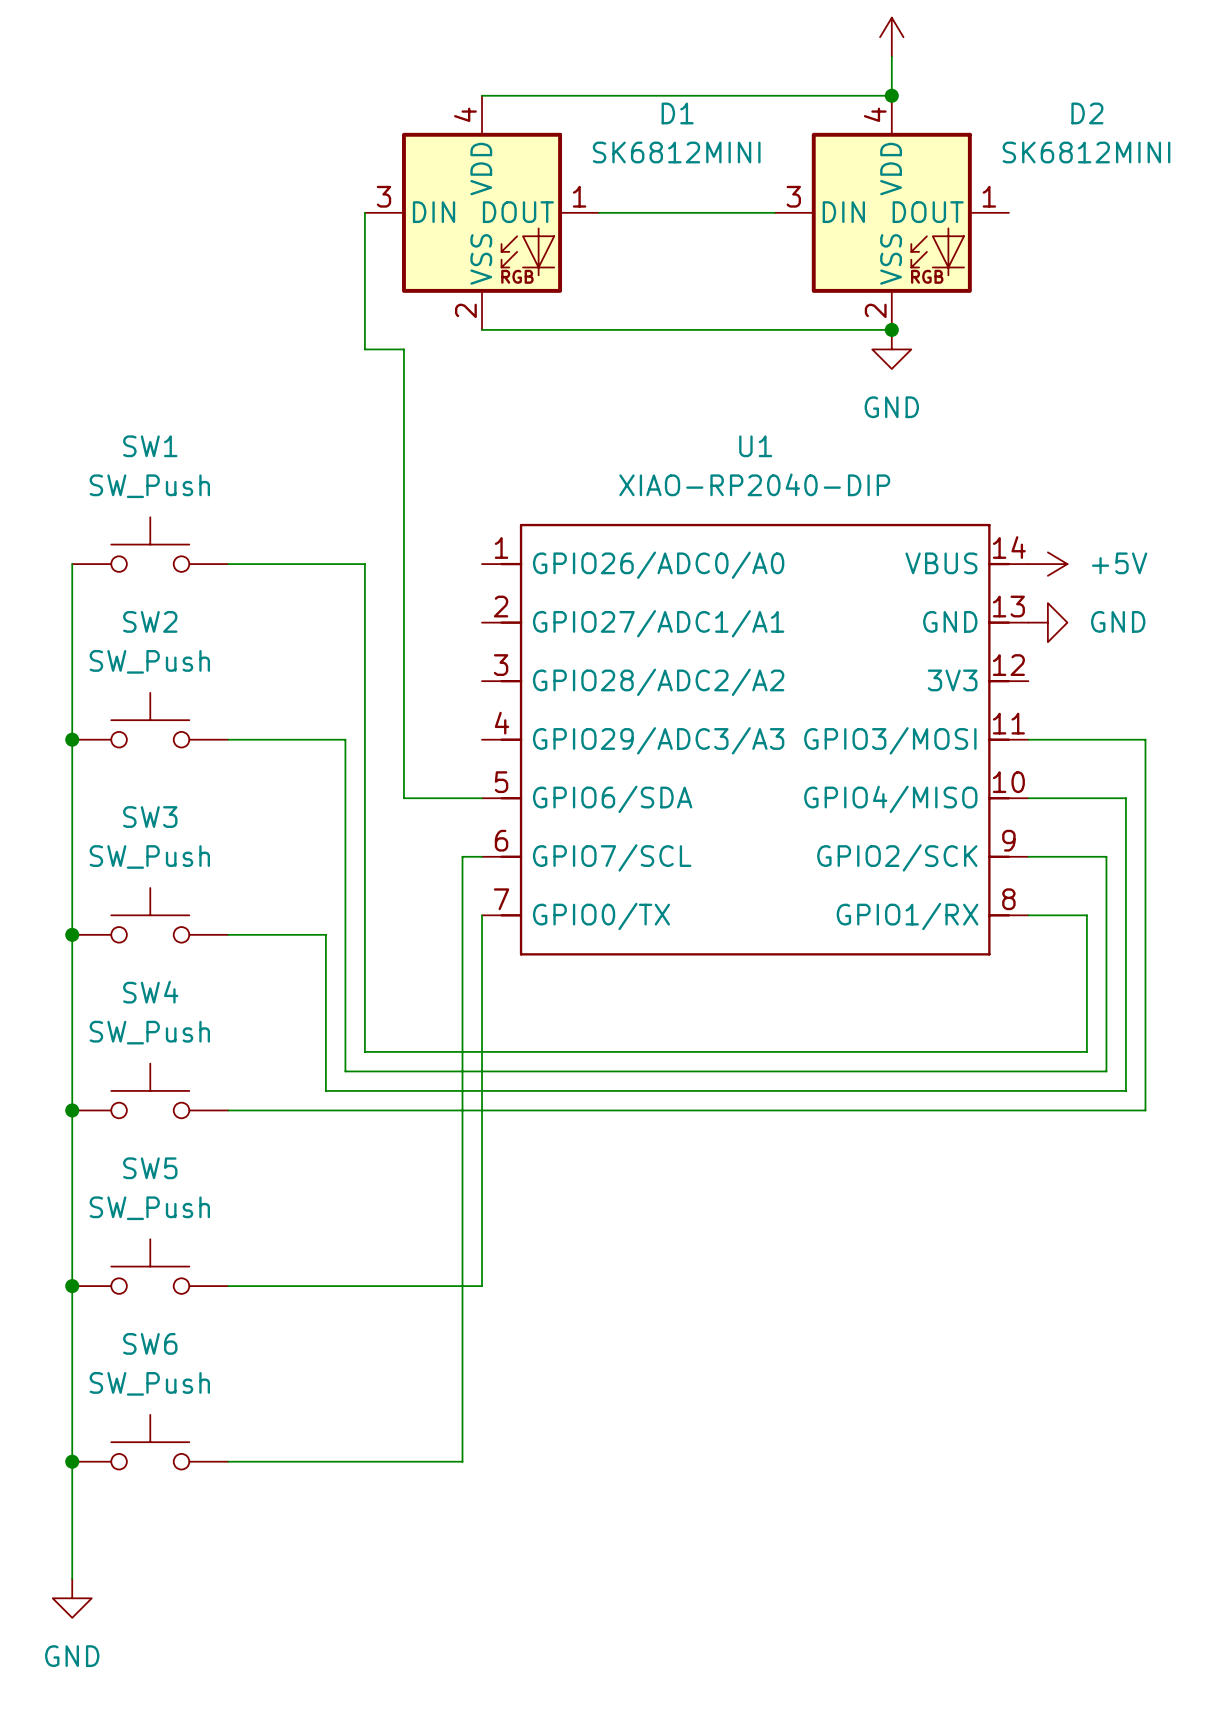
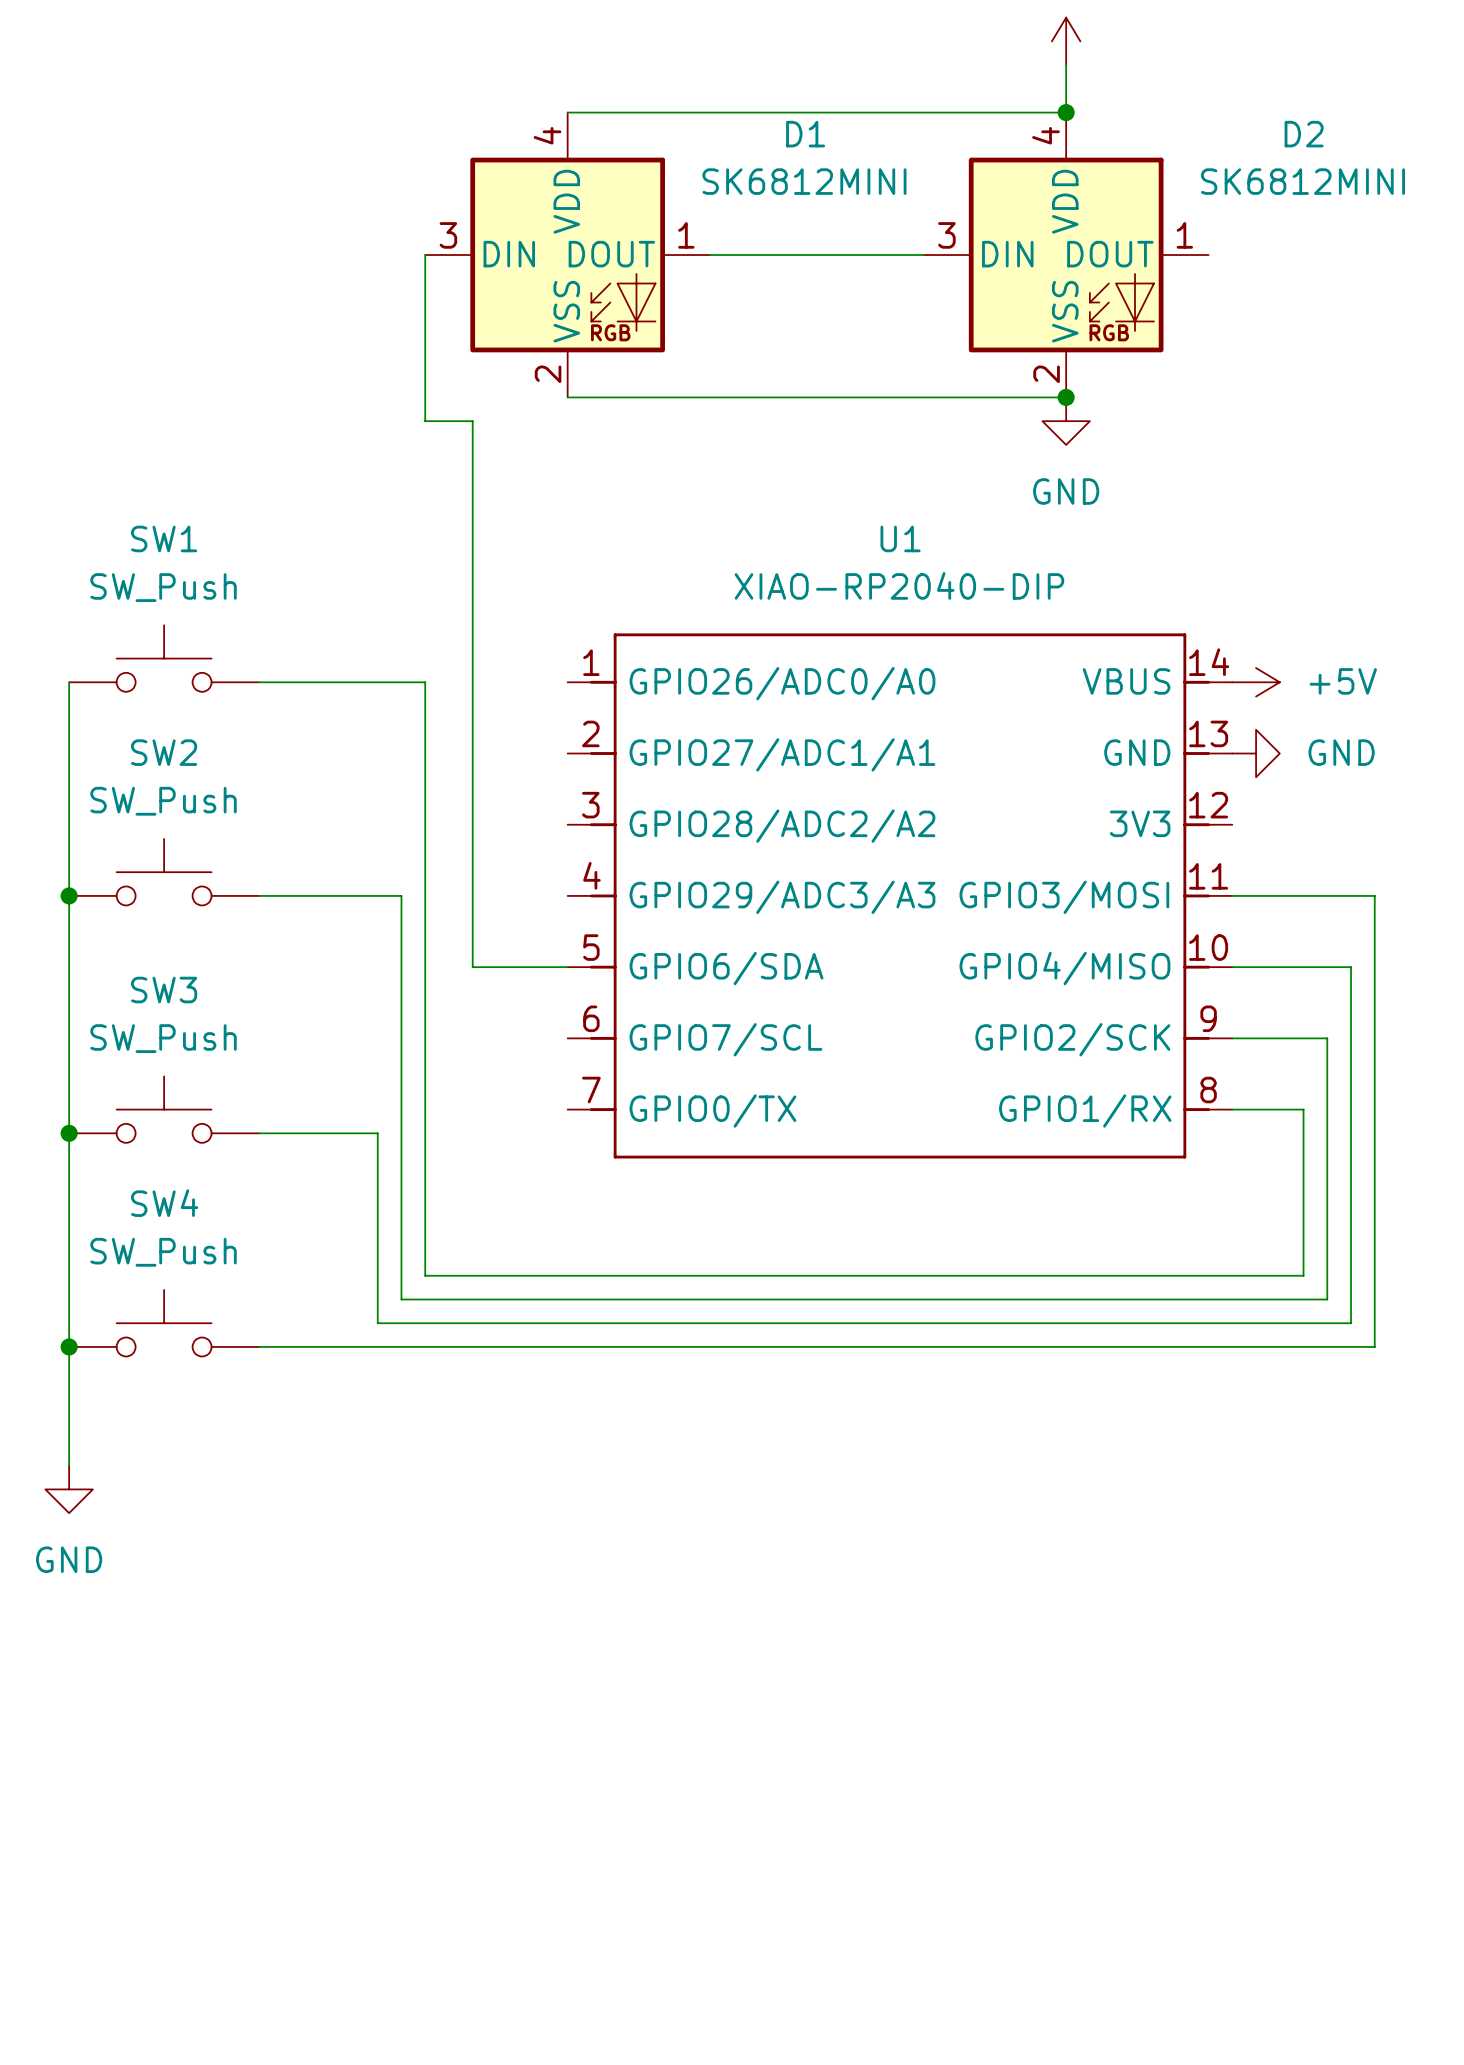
wire: (482, 856) (462, 856) (462, 1461) (228, 1461) -> none
wire: (482, 915) (482, 1286) (228, 1286) -> none
wire: (72, 1208) (72, 1578) -> none
SW5: SW_Push (150, 1266) -> none
junction: (72, 1286) -> none
SW6: SW_Push (150, 1442) -> none
junction: (72, 1461) -> none
power symbol position: GND (72, 1598) -> GND (69, 1489)

